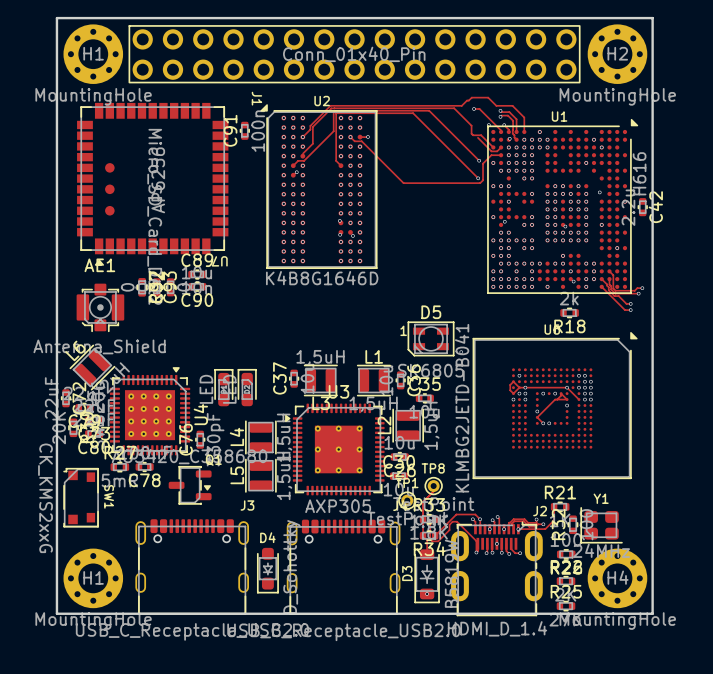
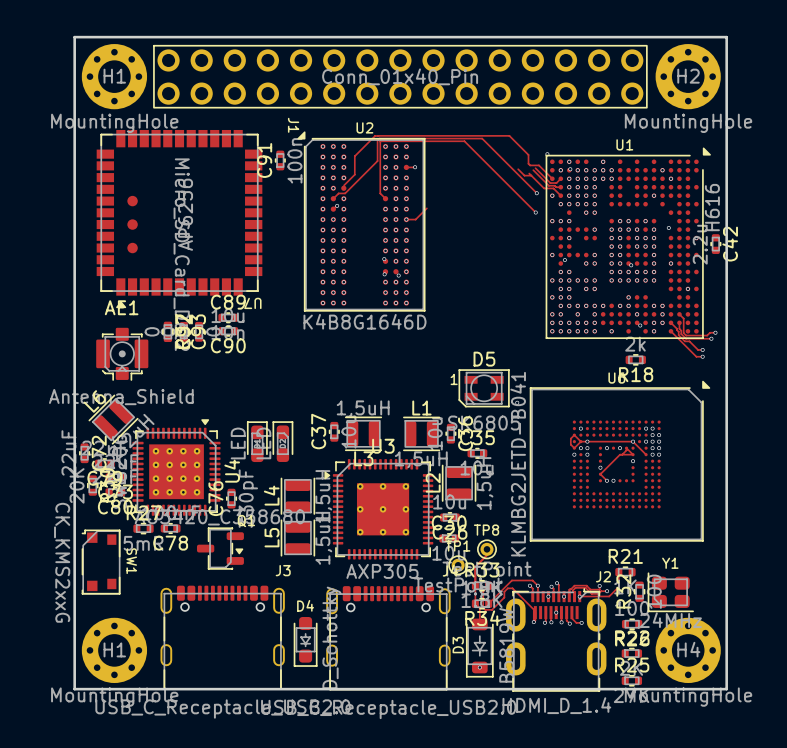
track: (474, 108) (479, 108) (501, 131) -> none
via: (474, 108) -> none
track: (500, 110) (509, 112) (516, 119) (516, 131) -> none
via: (500, 110) -> none
track: (500, 116) (507, 115) (513, 120) (512, 133) (516, 139) -> none
via: (500, 116) -> none
track: (504, 125) (508, 131) -> none
via: (504, 125) -> none
via: none -> (569, 161)
track: (524, 131) (524, 117) (512, 105) (496, 105) (488, 97) (471, 97) (461, 105) (330, 105) (310, 125) (310, 129) (302, 137) -> none
track: (350, 137) (354, 141) (361, 141) (403, 183) (480, 183) (483, 180) (483, 163) (491, 155) (496, 155) -> (533, 170) (548, 185) (556, 187)
track: none -> (518, 169) (524, 175) (531, 175)
via: none -> (560, 170)
via: none -> (577, 170)
track: none -> (529, 173) (544, 188) (553, 188) (560, 195)
track: none -> (426, 208) (415, 219) (406, 219)

